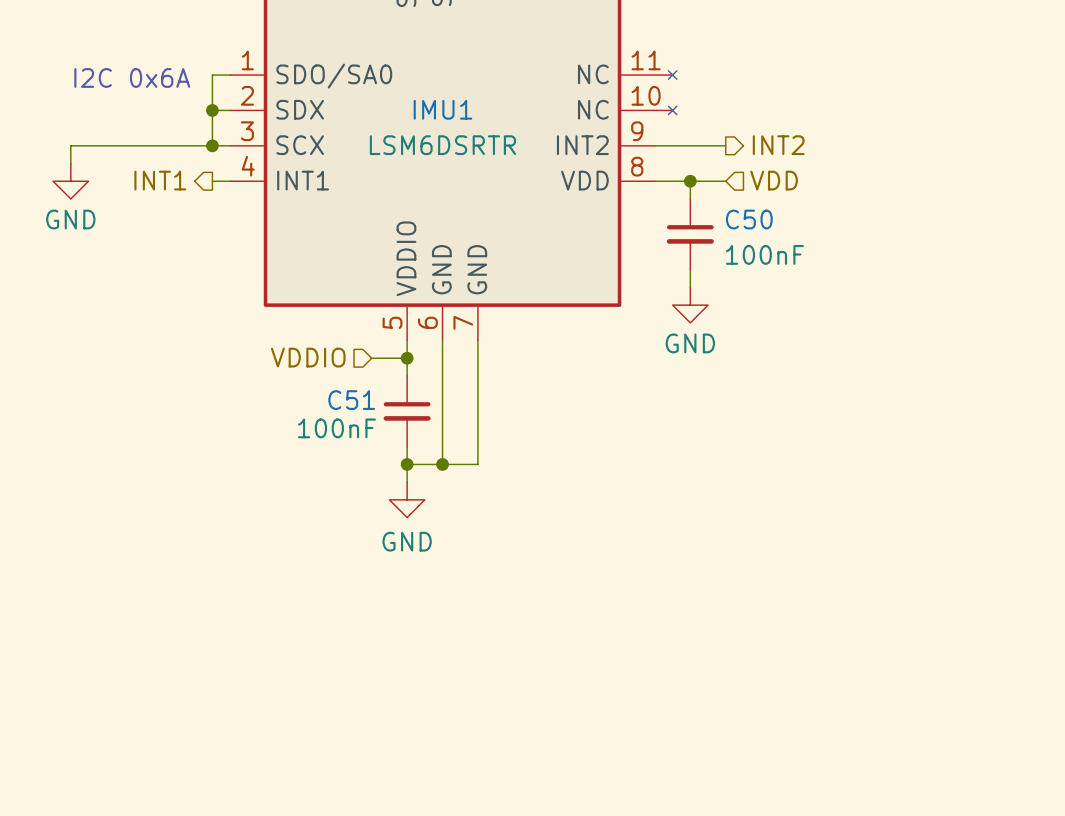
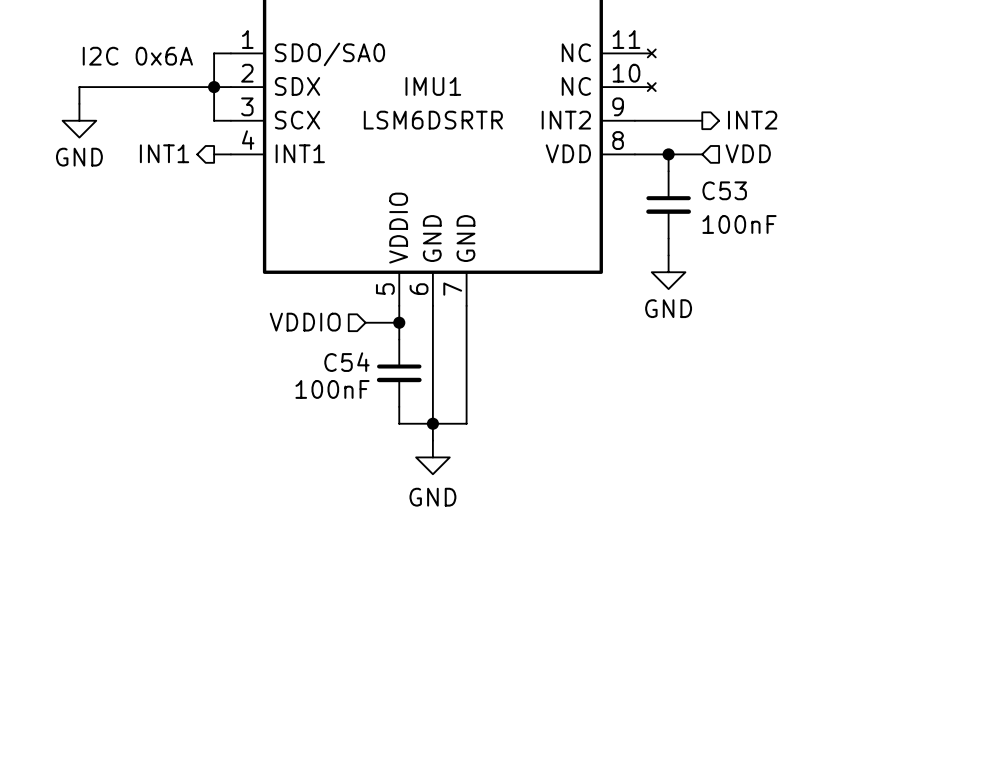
wire: (212, 145) (70, 145) (70, 163) -> (214, 87) (79, 87) (79, 103)
junction: (212, 145) -> none
power symbol position: GND (70, 181) -> GND (79, 120)
C50 name: C50 (749, 219) -> C53 (724, 190)
C51 name: C51 (351, 400) -> C54 (346, 362)
wire: (407, 464) (407, 482) -> (432, 423) (432, 440)
junction: (407, 464) -> none
power symbol position: GND (407, 499) -> GND (432, 457)

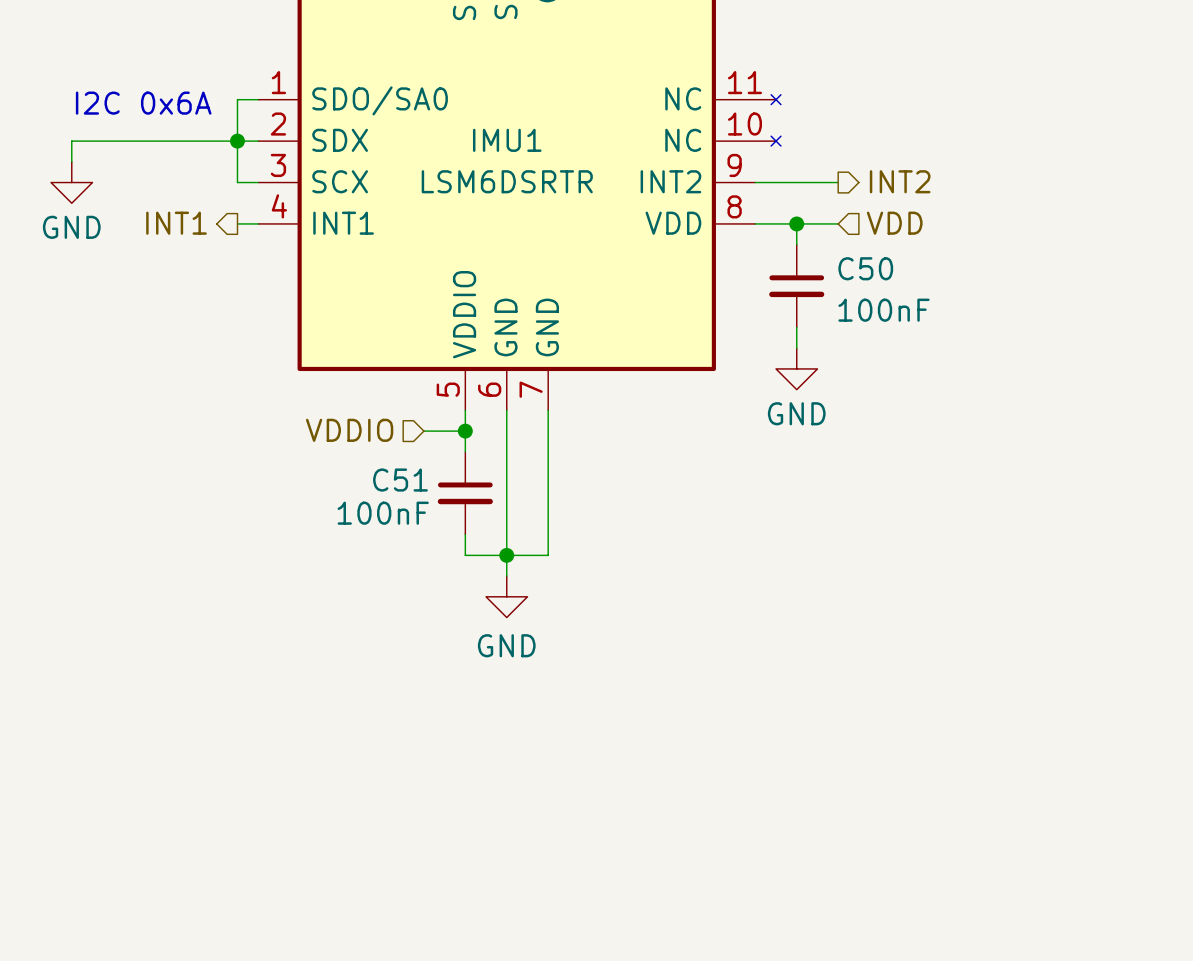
C53 name: C53 (724, 190) -> C50 (865, 268)
C54 name: C54 (346, 362) -> C51 (400, 480)

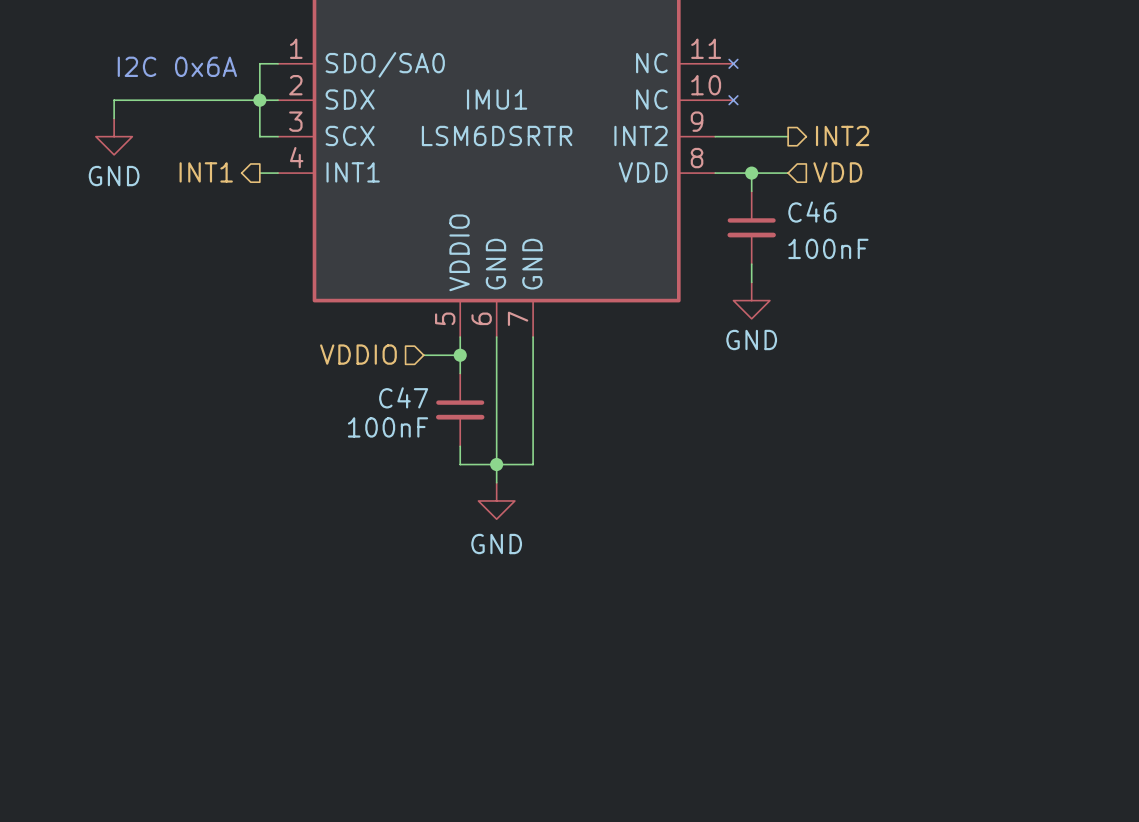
C50 name: C50 (865, 268) -> C46 (812, 212)
C51 name: C51 (400, 480) -> C47 (403, 397)

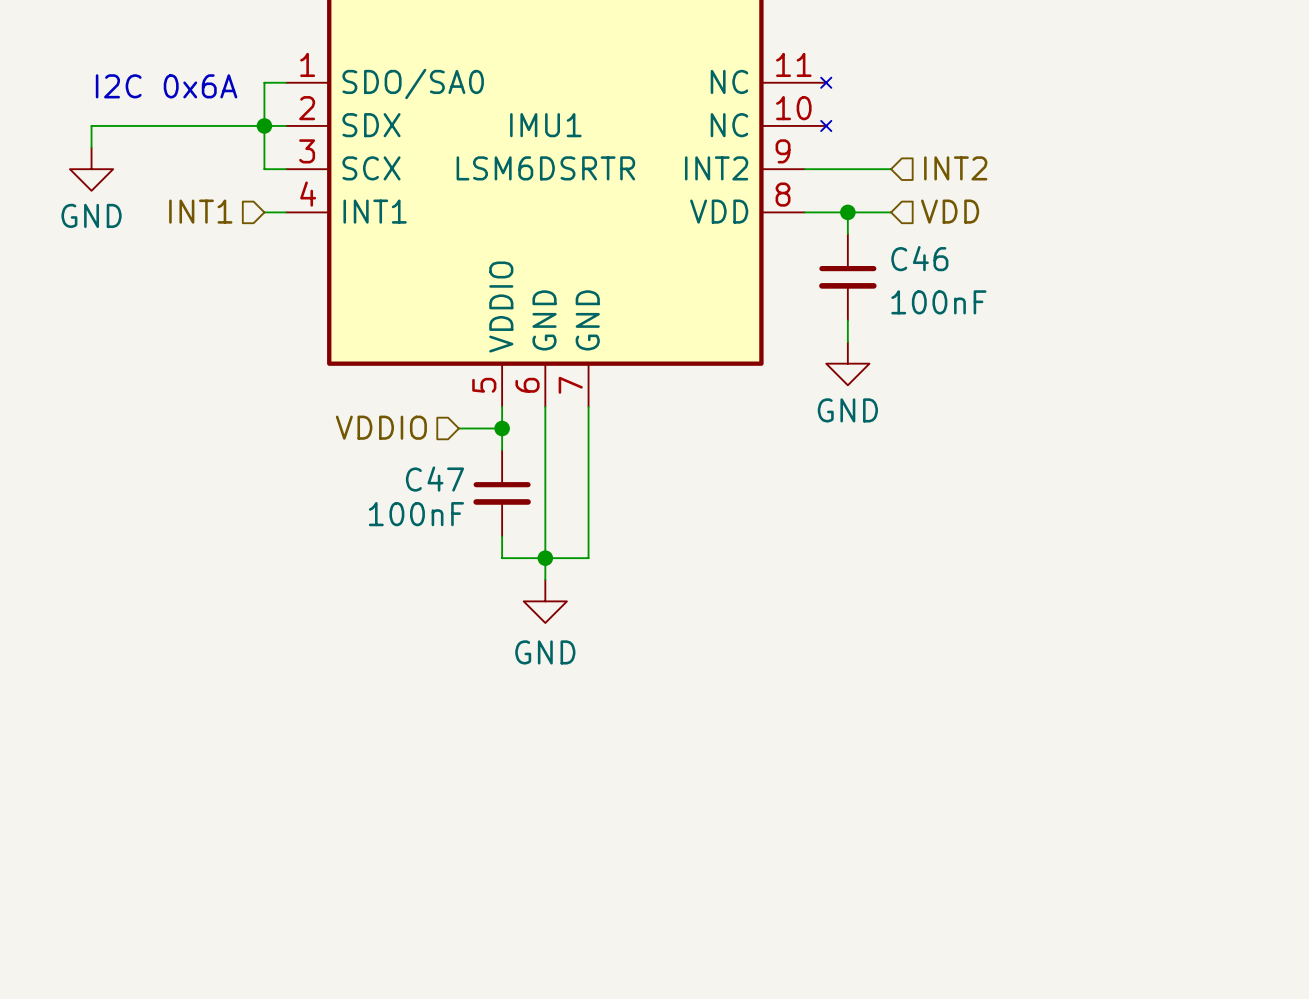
hierarchical label shape: output (842, 135) -> input (955, 168)
hierarchical label shape: output (206, 172) -> input (200, 211)

